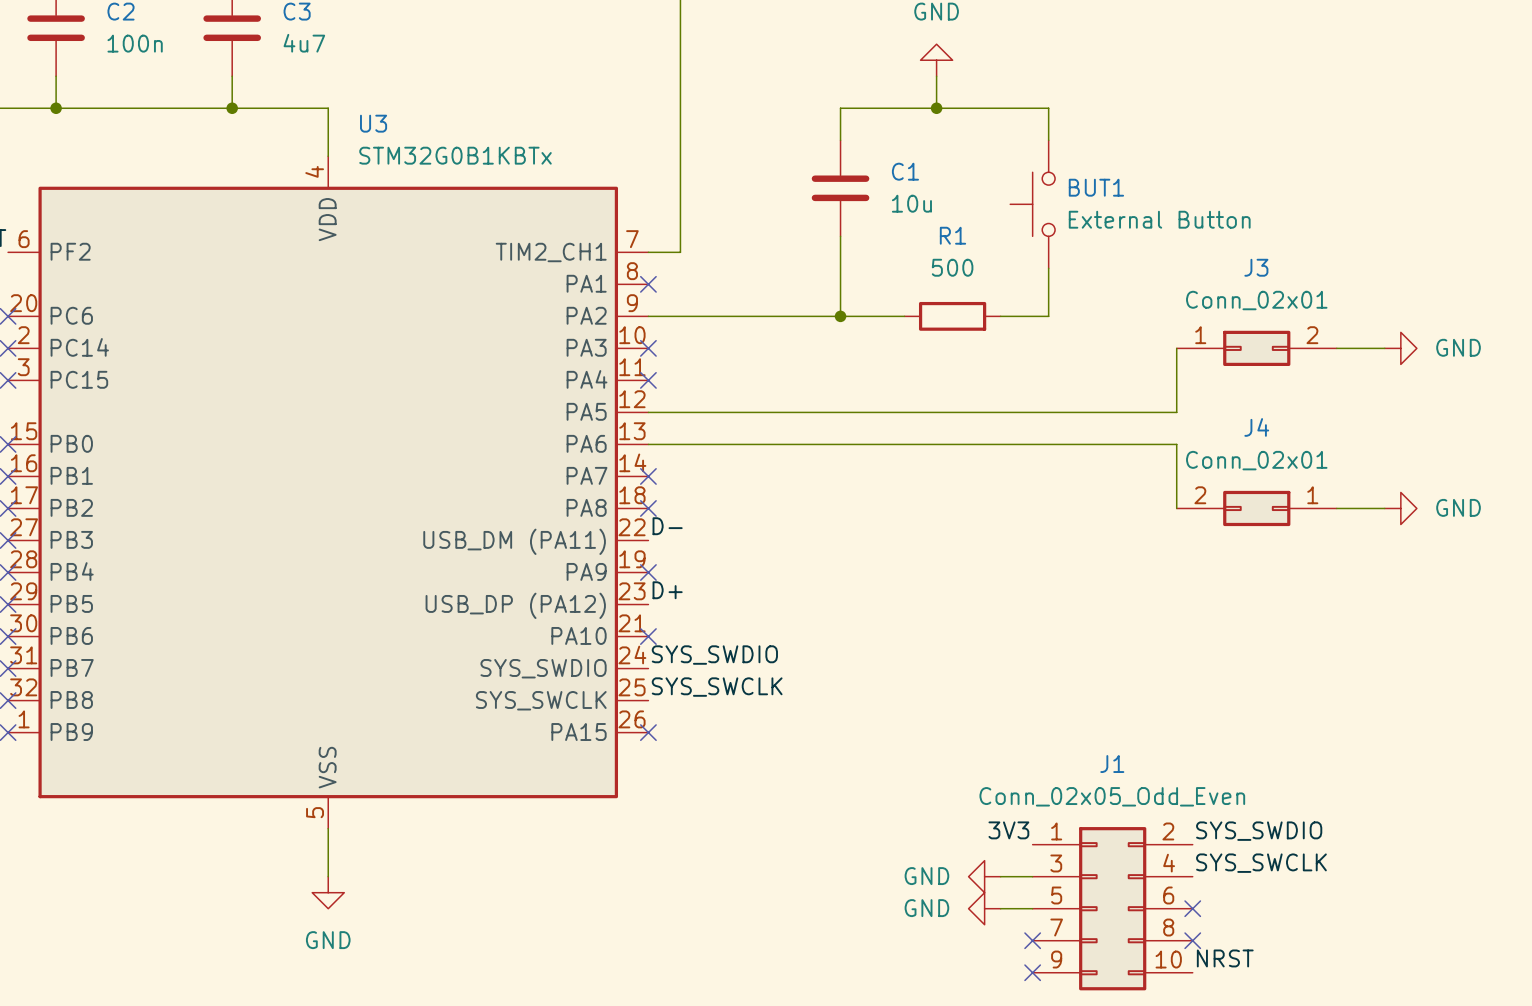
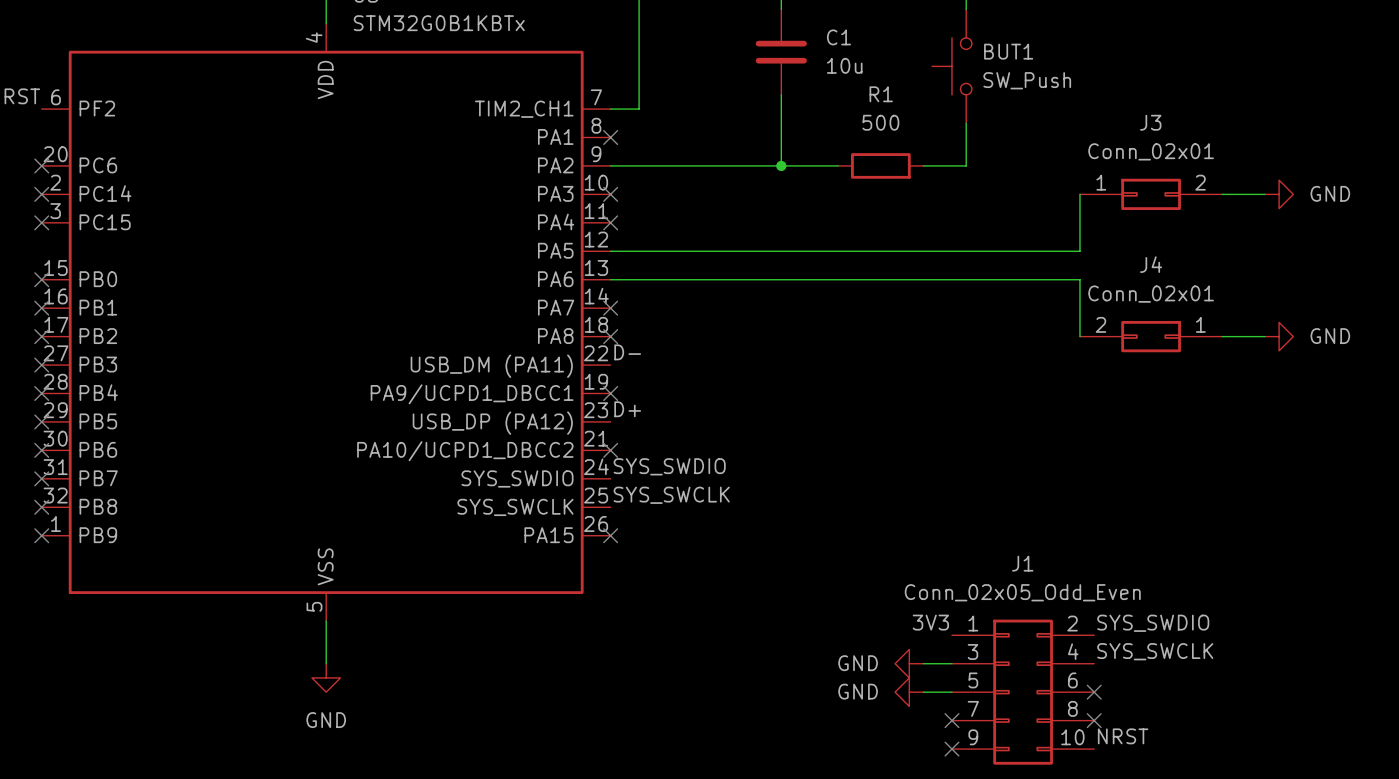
BUT1 value: External Button (1159, 219) -> SW_Push (1027, 80)
U3 pin name: PA9 (586, 571) -> PA9/UCPD1_DBCC1 (472, 394)
U3 pin name: PA10 (579, 635) -> PA10/UCPD1_DBCC2 (465, 451)

